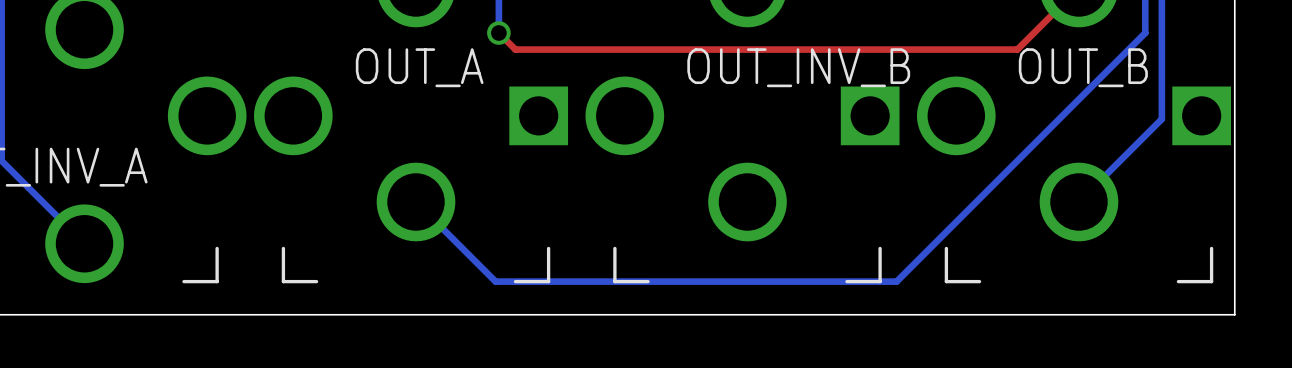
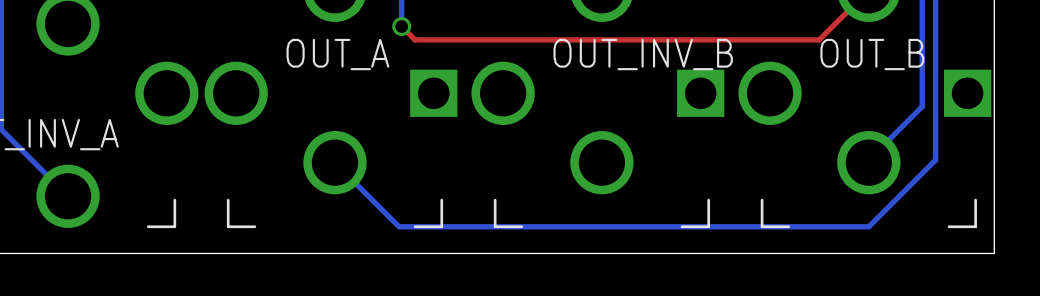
bottom track: (1145, 33) (896, 281) -> (935, 95) (935, 160) (868, 226) (722, 226)
bottom track: (1161, 119) (1078, 202) -> (922, 26) (922, 106) (868, 160) (868, 162)

